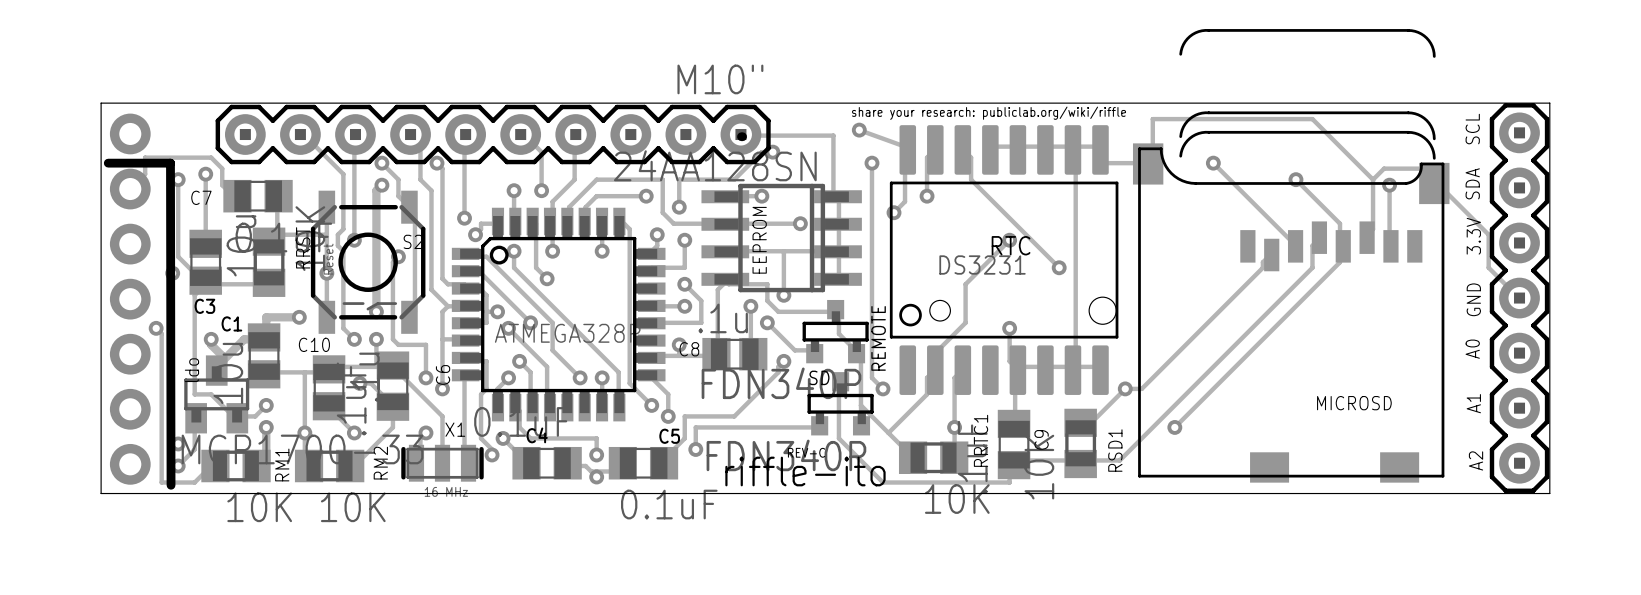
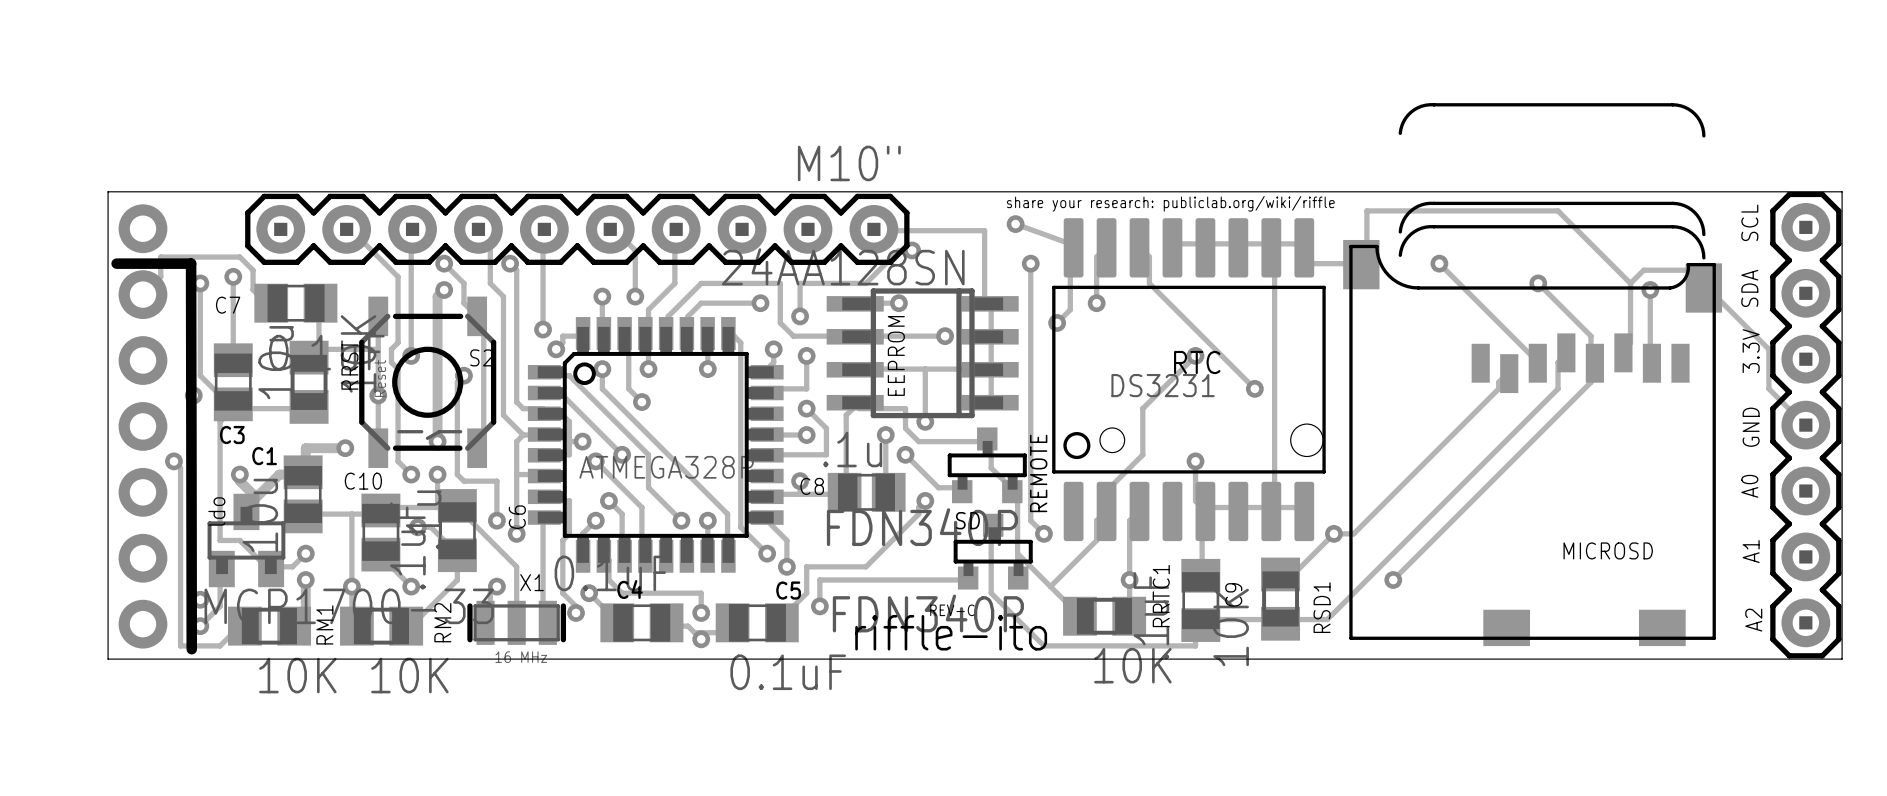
line: (741, 136) (742, 136) -> none

